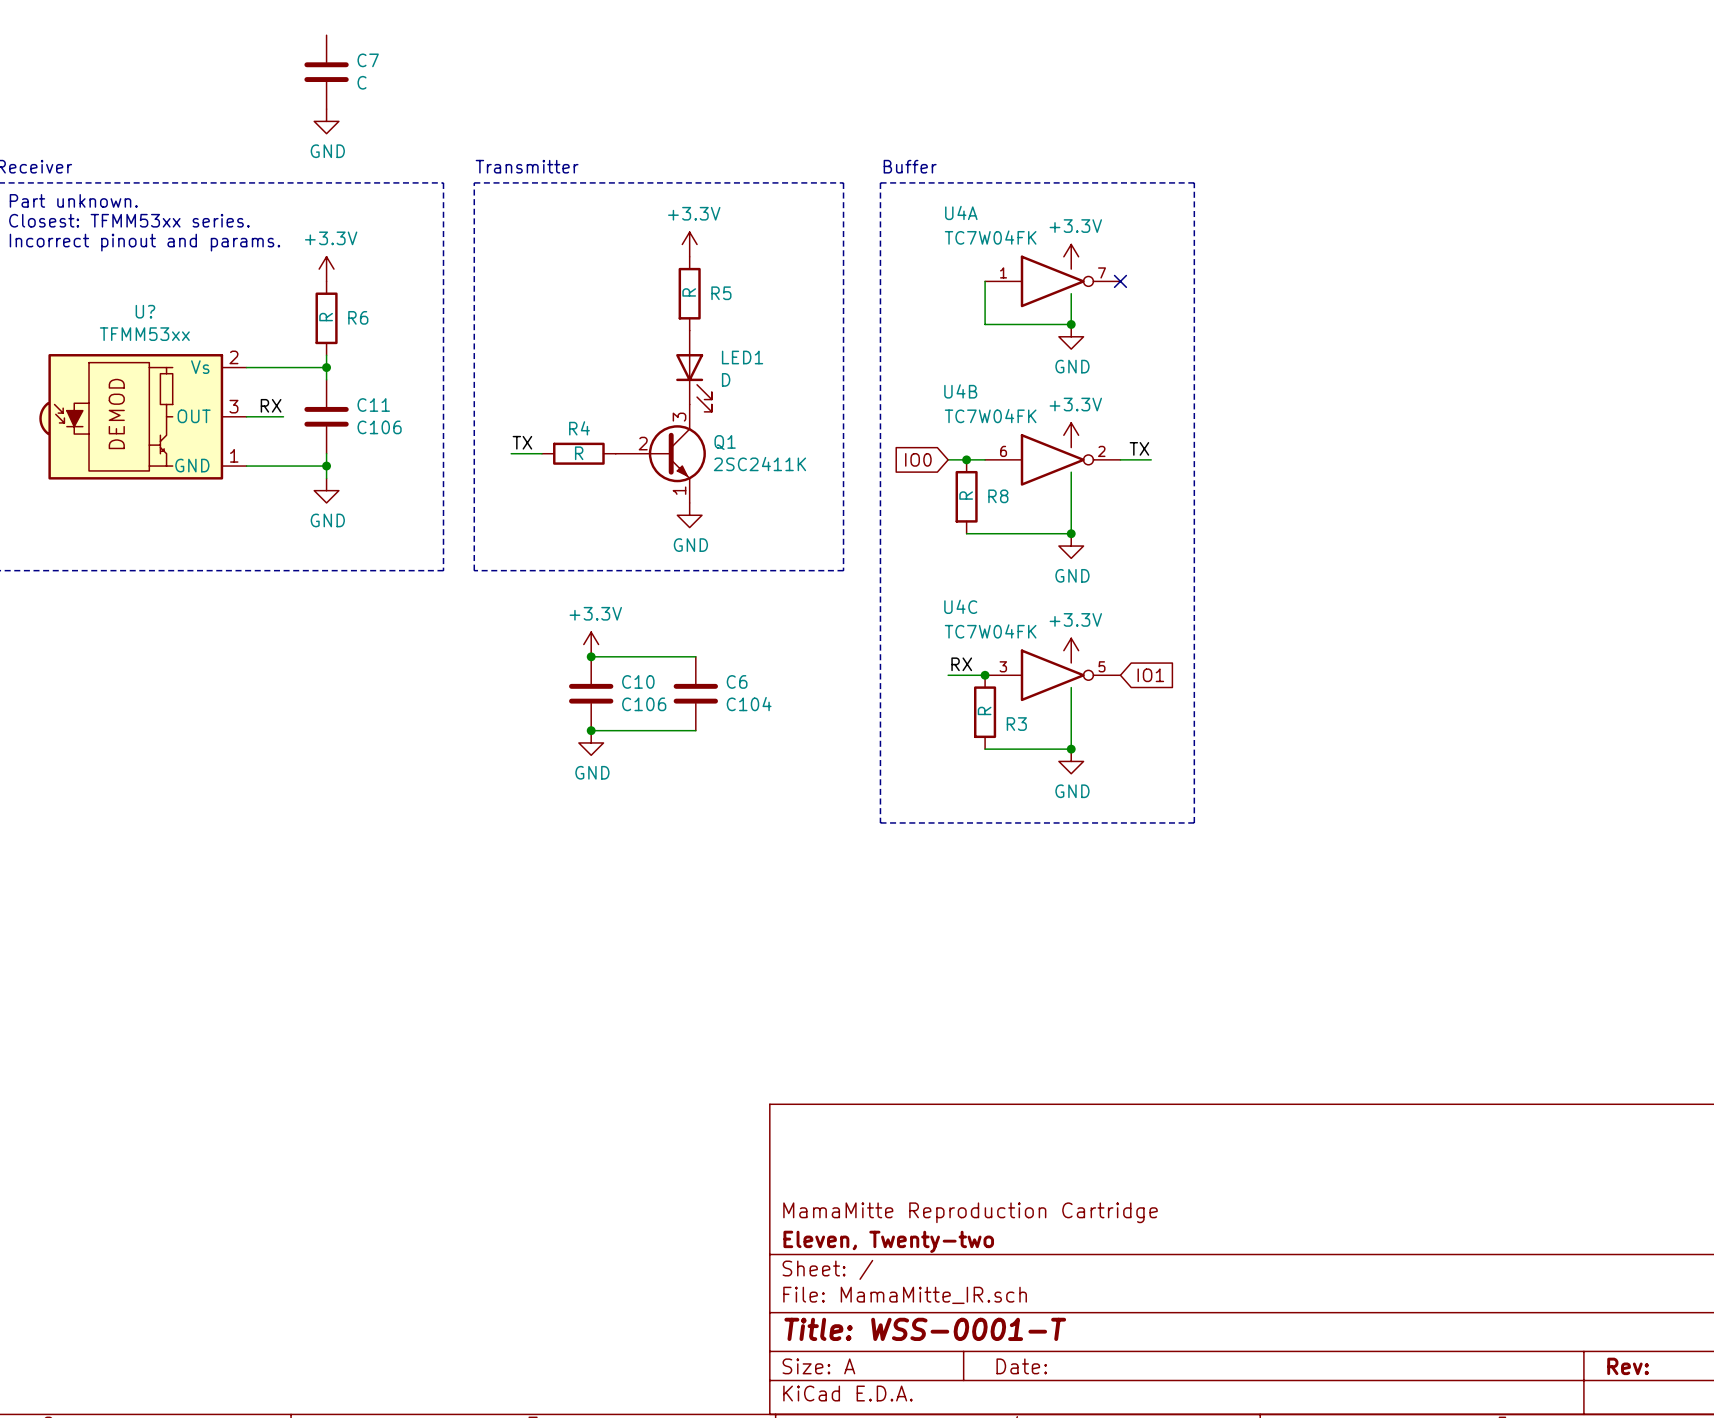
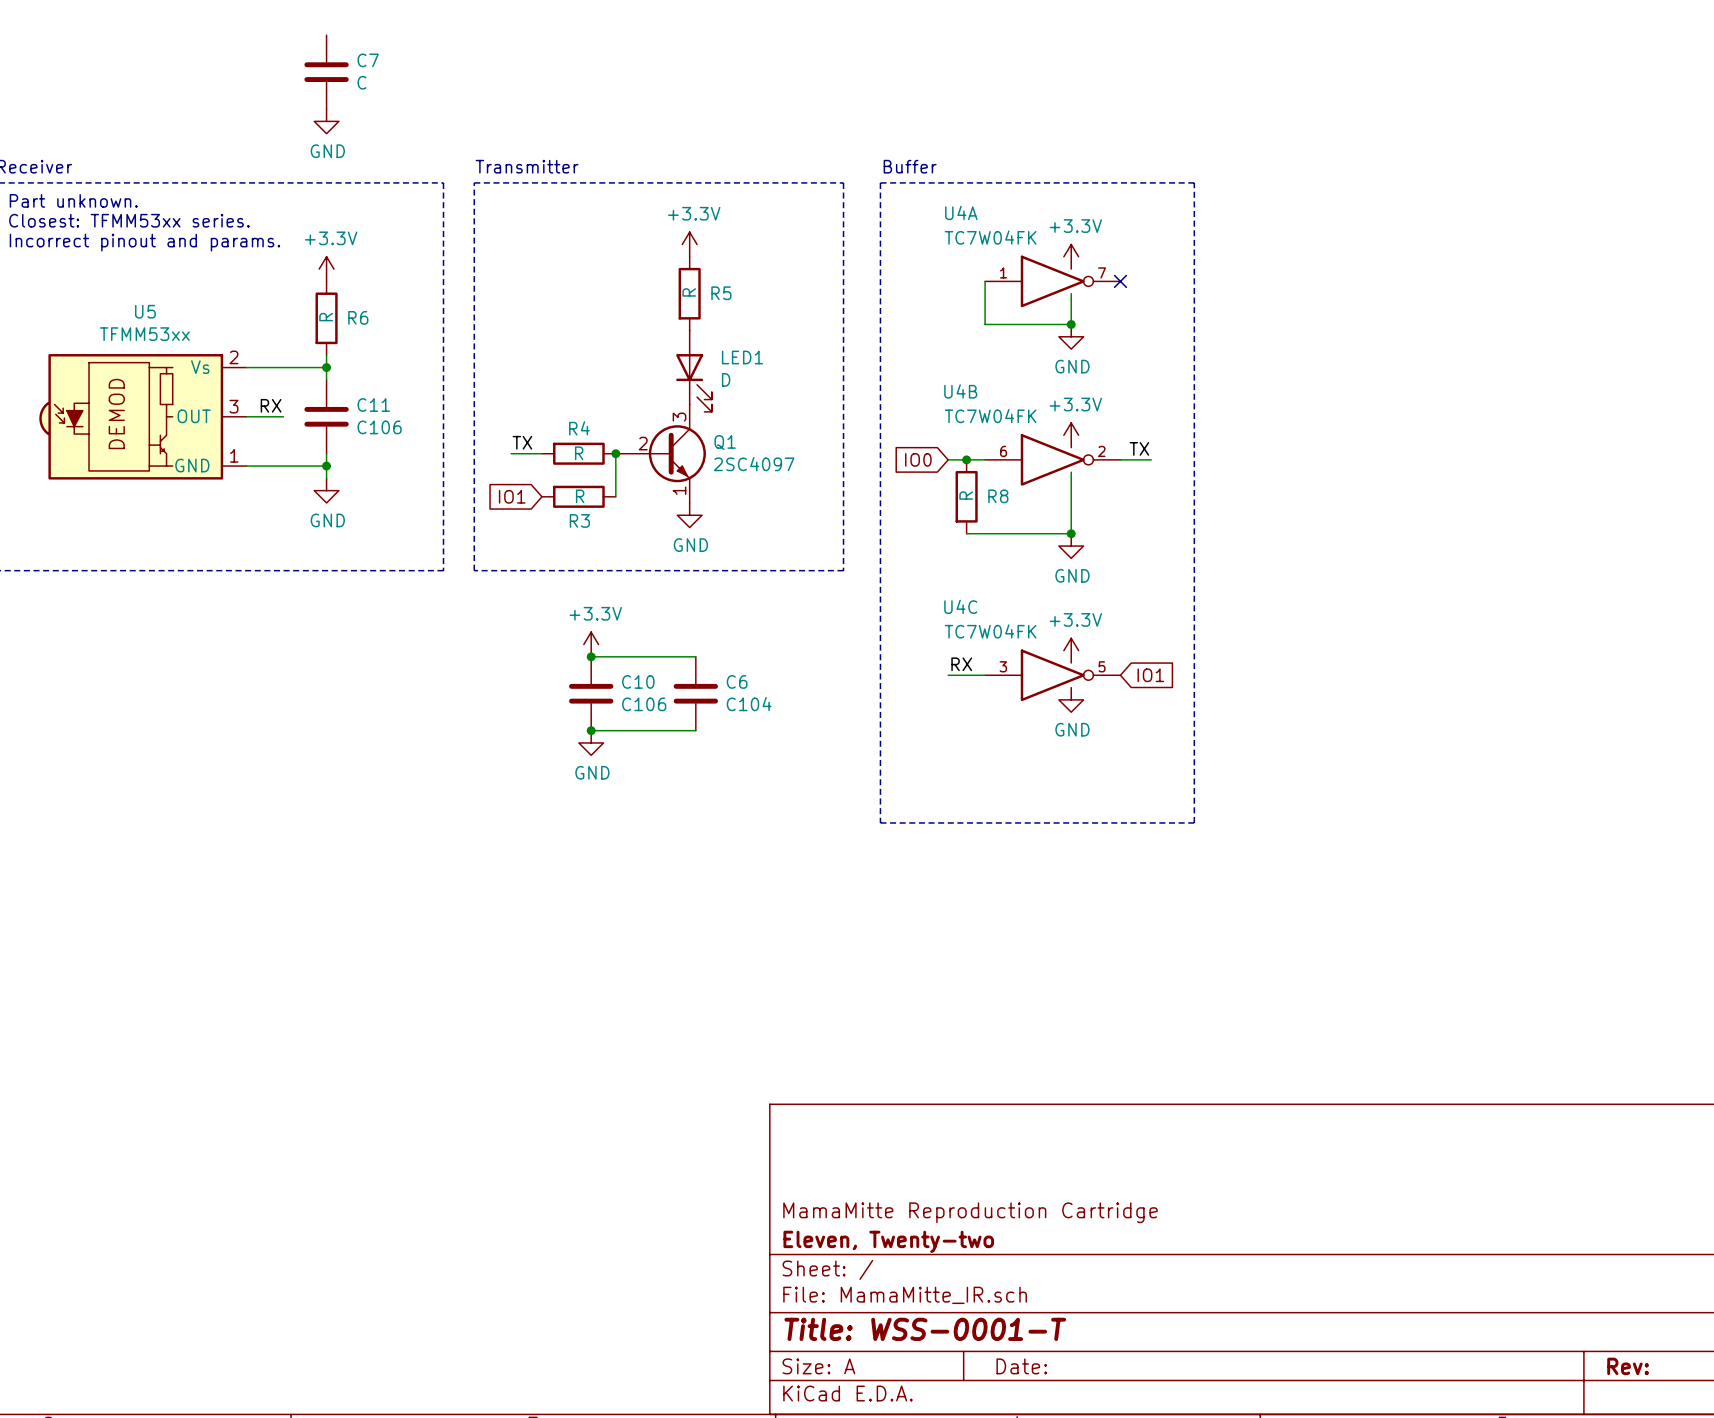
U? name: U? (145, 311) -> U5 (145, 311)
wire: none -> (615, 453) (615, 496)
junction: none -> (615, 453)
Q1 value: 2SC2411K (759, 464) -> 2SC4097 (754, 464)
global label: none -> IO1 (512, 496)
junction: (985, 675) -> none
wire: (1071, 687) (1071, 749) (985, 749) -> none
R3 rotation: 0° (985, 712) -> 90° clockwise (578, 496)
R3 position: (985, 712) -> (578, 496)
junction: (1071, 749) -> none
power symbol position: GND (1071, 761) -> GND (1071, 699)

